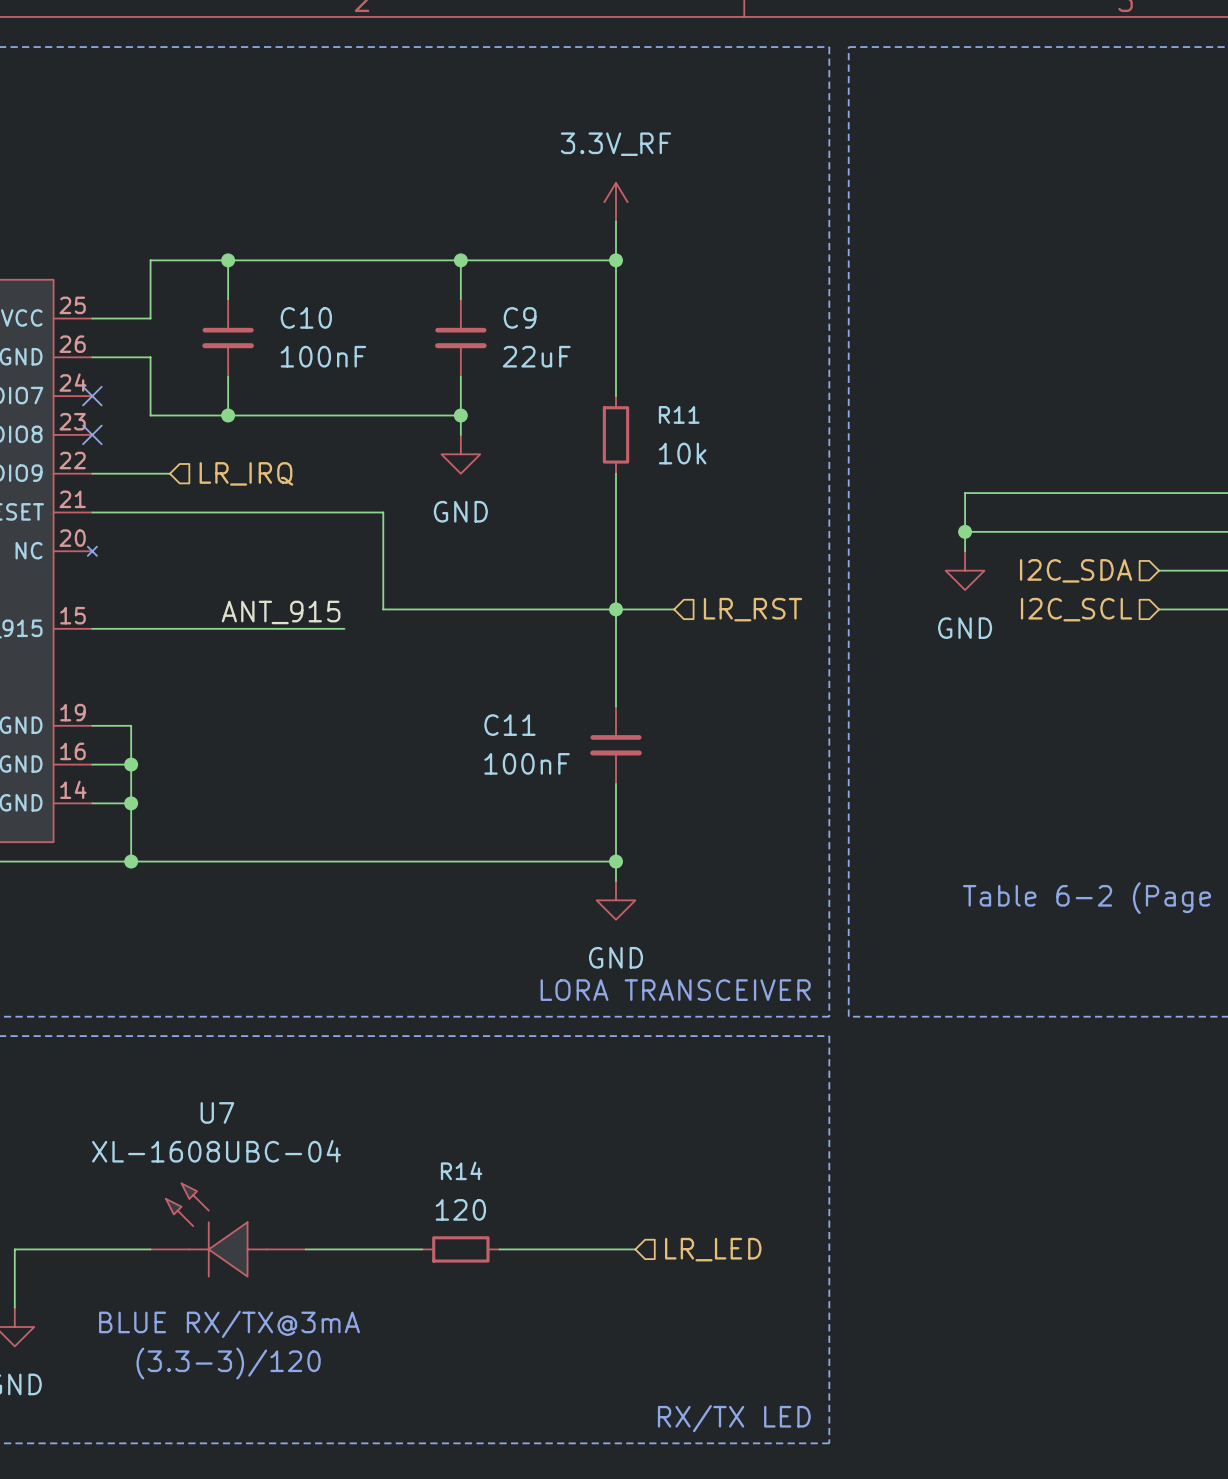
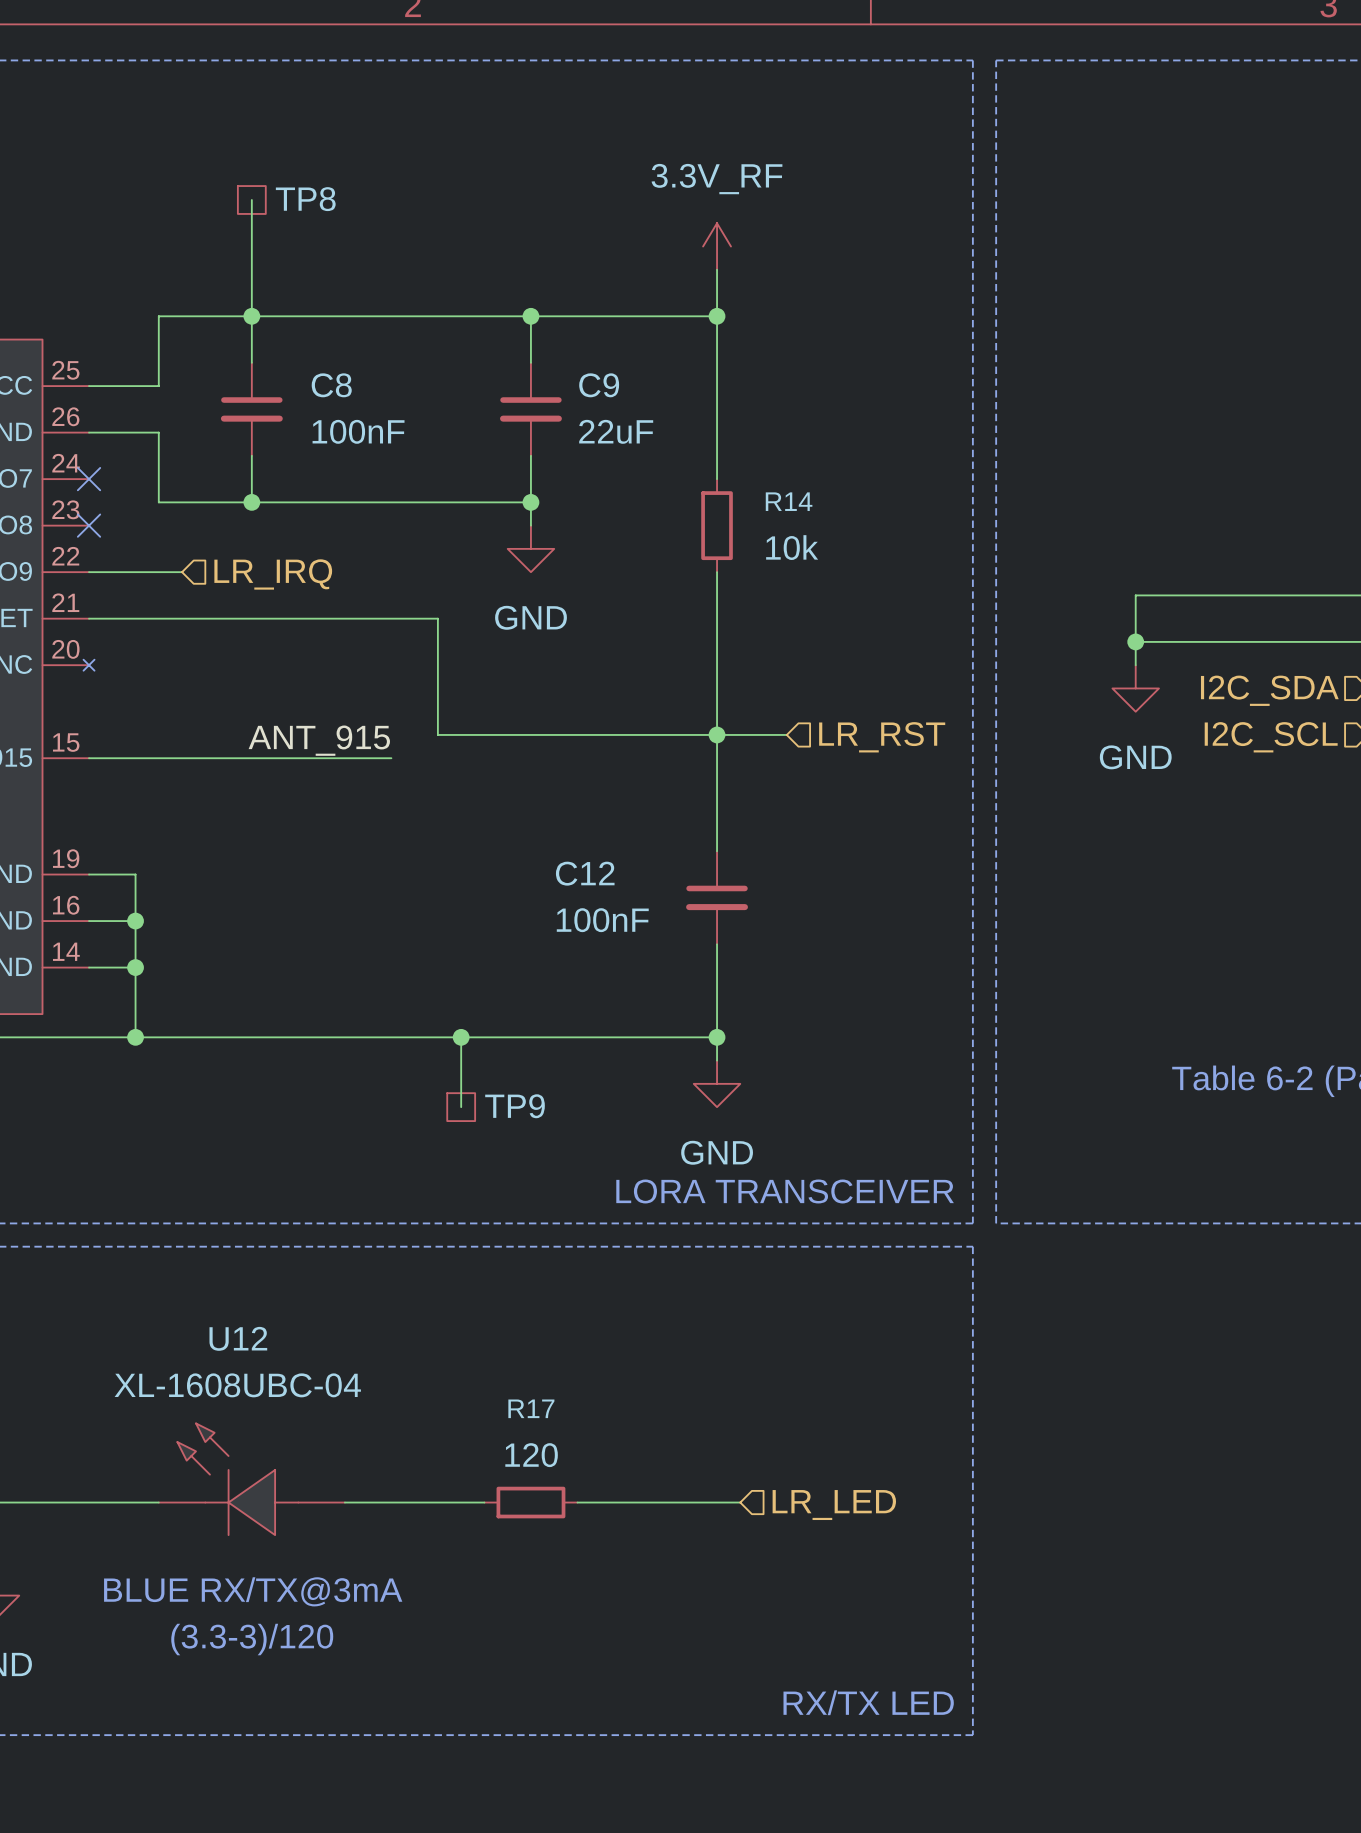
wire: none -> (251, 200) (251, 316)
TP8: none -> (251, 200)
C10 name: C10 (306, 317) -> C8 (331, 385)
R11 name: R11 (679, 414) -> R14 (789, 501)
C11 name: C11 (509, 725) -> C12 (585, 873)
wire: none -> (461, 1037) (461, 1107)
junction: none -> (461, 1037)
TP9: none -> (461, 1107)
U7 name: U7 (217, 1112) -> U12 (238, 1338)
R14 name: R14 (461, 1170) -> R17 (531, 1408)

